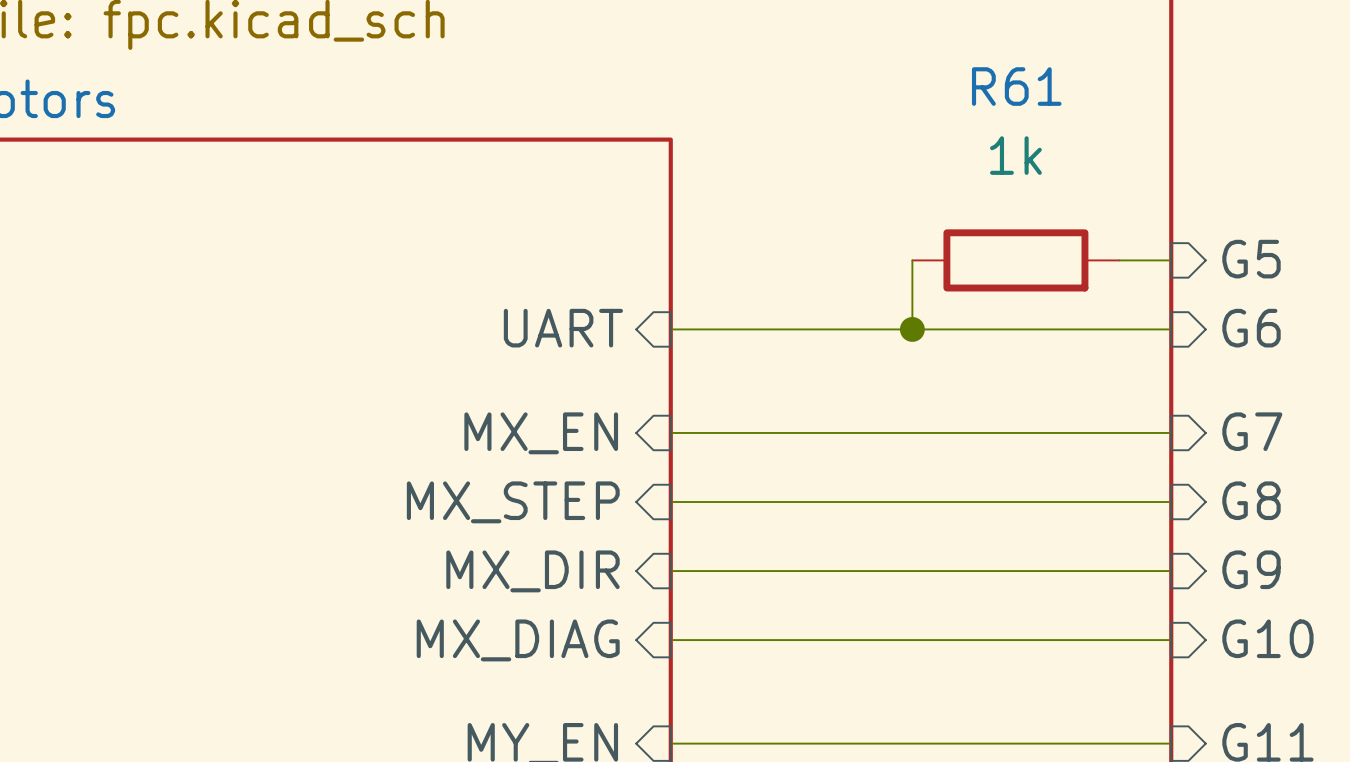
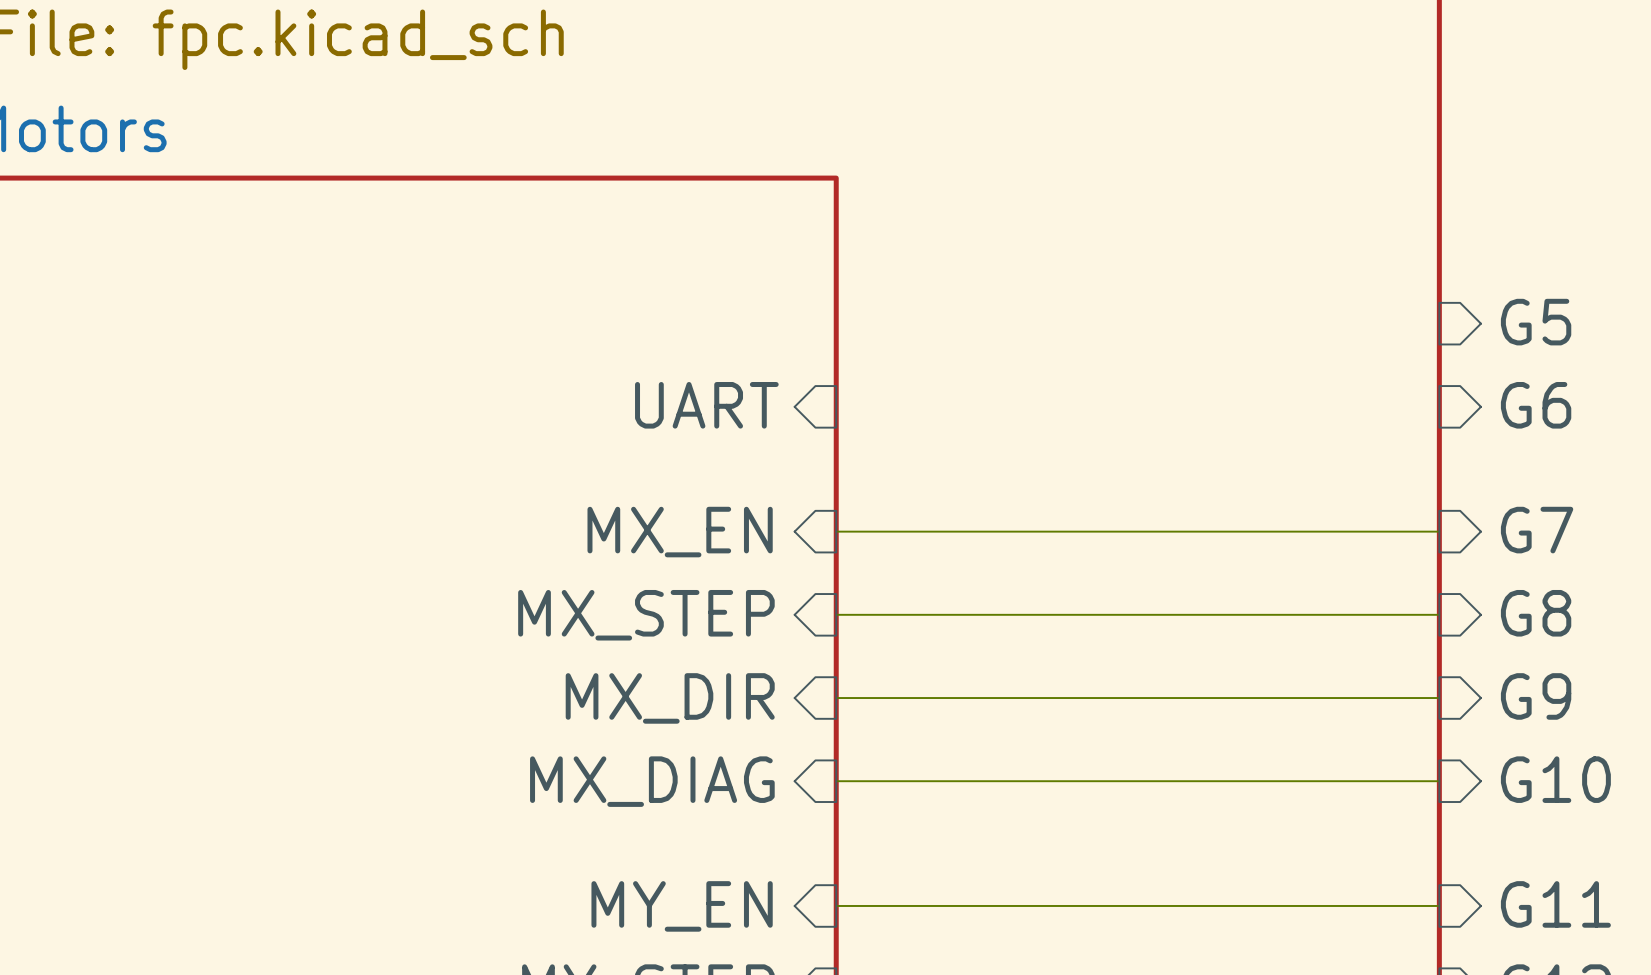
wire: (912, 260) (912, 329) -> none
R61: 1k (1015, 260) -> none
wire: (1119, 260) (1171, 260) -> none
wire: (670, 329) (1171, 329) -> none
junction: (912, 329) -> none

